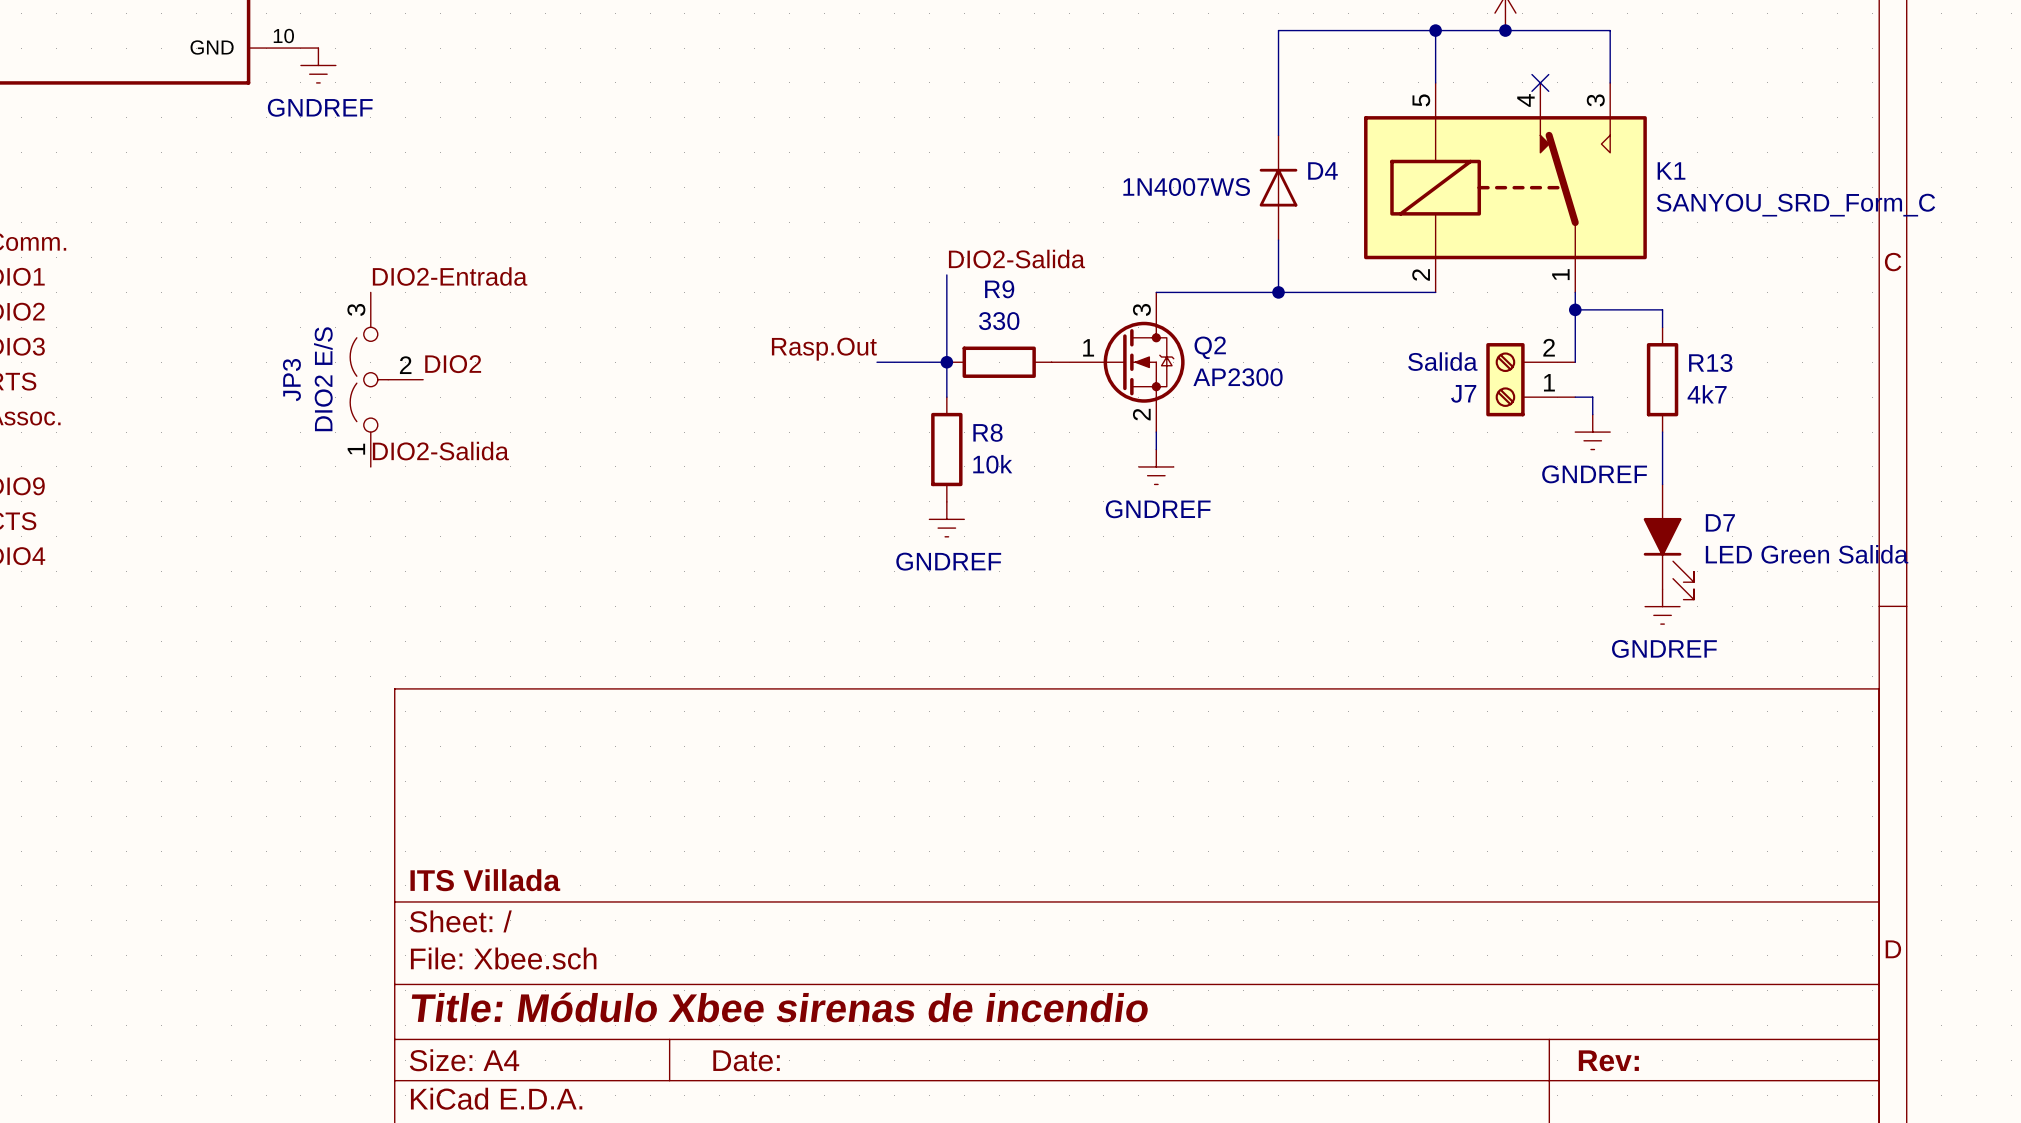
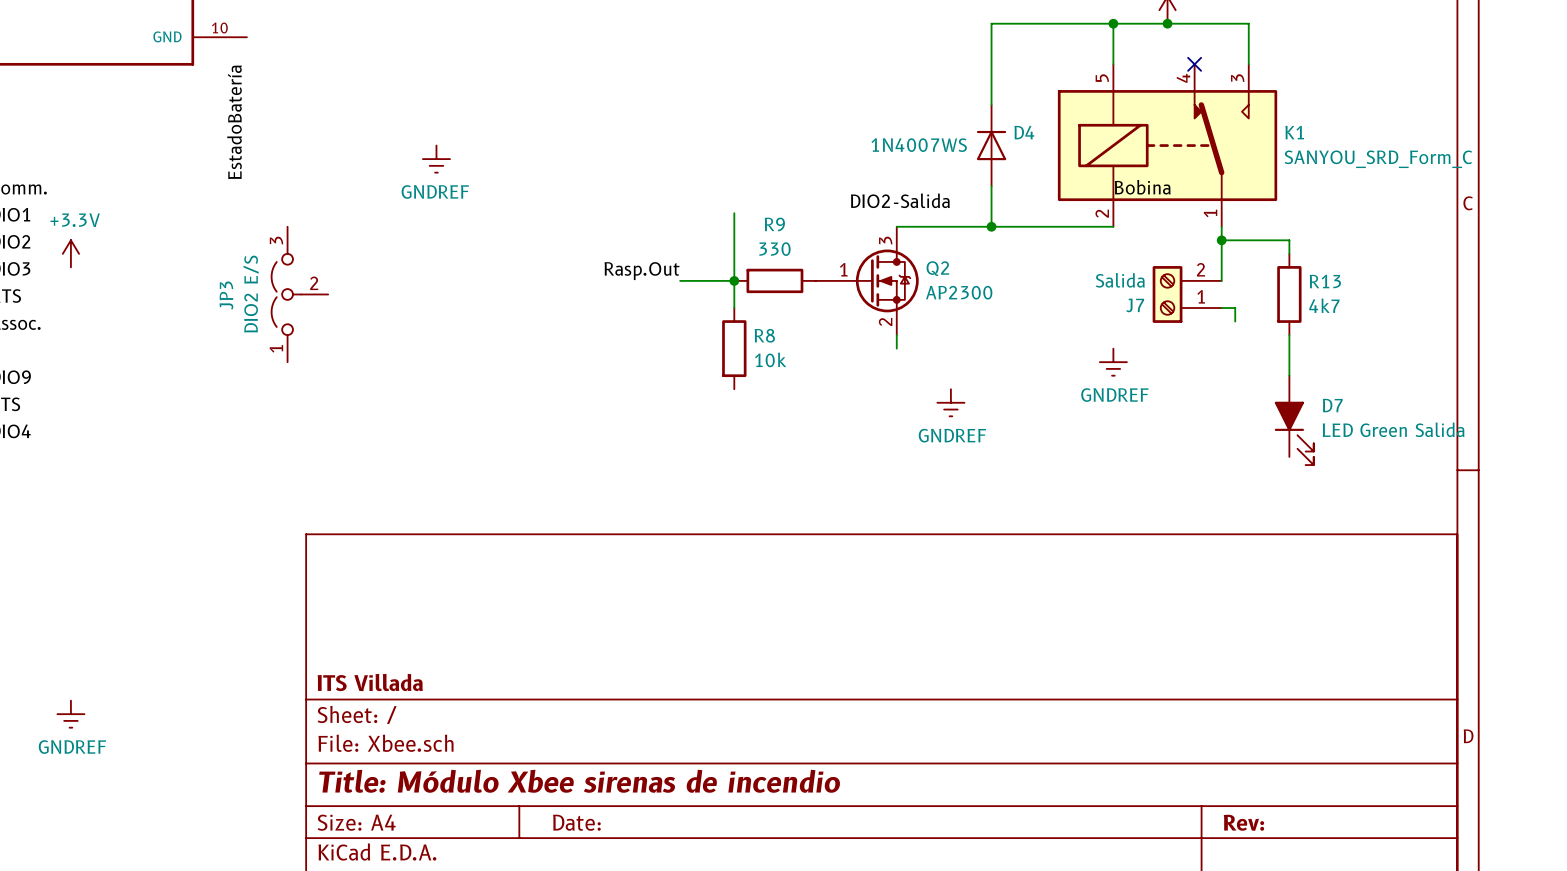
power symbol: GNDREF (318, 65) -> none
label: none -> EstadoBatería (234, 122)
power symbol: none -> GNDREF (436, 159)
label: none -> Bobina (1142, 187)
label position: DIO2-Salida (1016, 259) -> DIO2-Salida (900, 200)
label: DIO2-Entrada (450, 276) -> none
power symbol: none -> +3.3V (70, 253)
label: DIO2 (453, 364) -> none
power symbol: GNDREF (1592, 432) -> none
label: DIO2-Salida (440, 451) -> none
power symbol position: GNDREF (1156, 466) -> GNDREF (950, 402)
power symbol: none -> GNDREF (1113, 362)
power symbol: GNDREF (946, 519) -> none
power symbol: GNDREF (1662, 606) -> none
power symbol: none -> GNDREF (70, 714)

